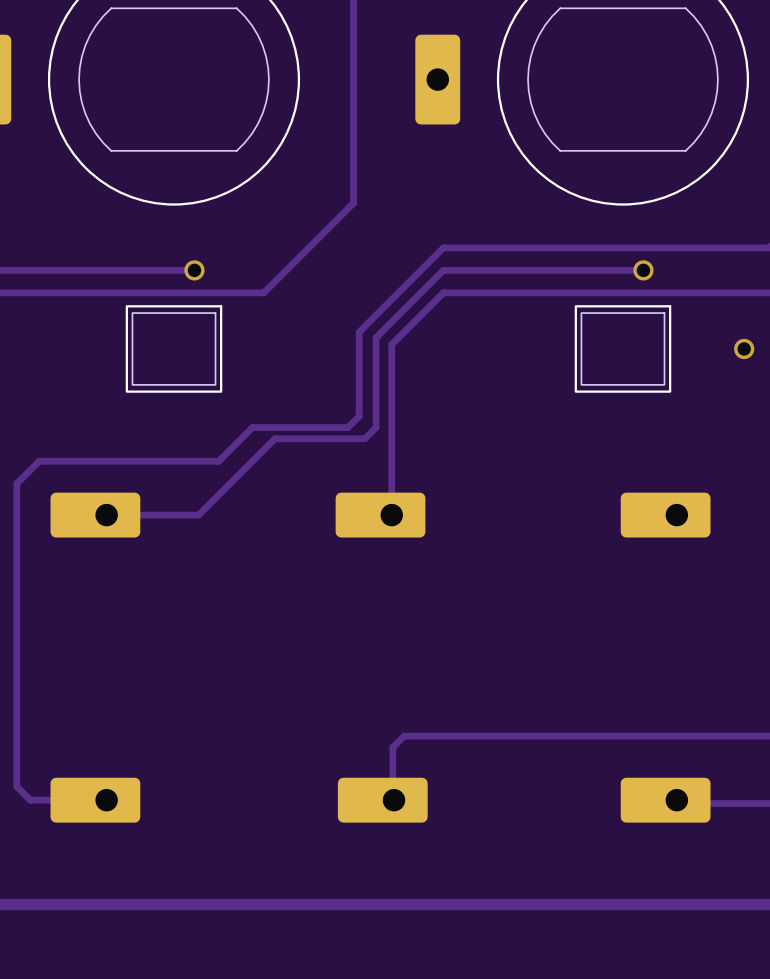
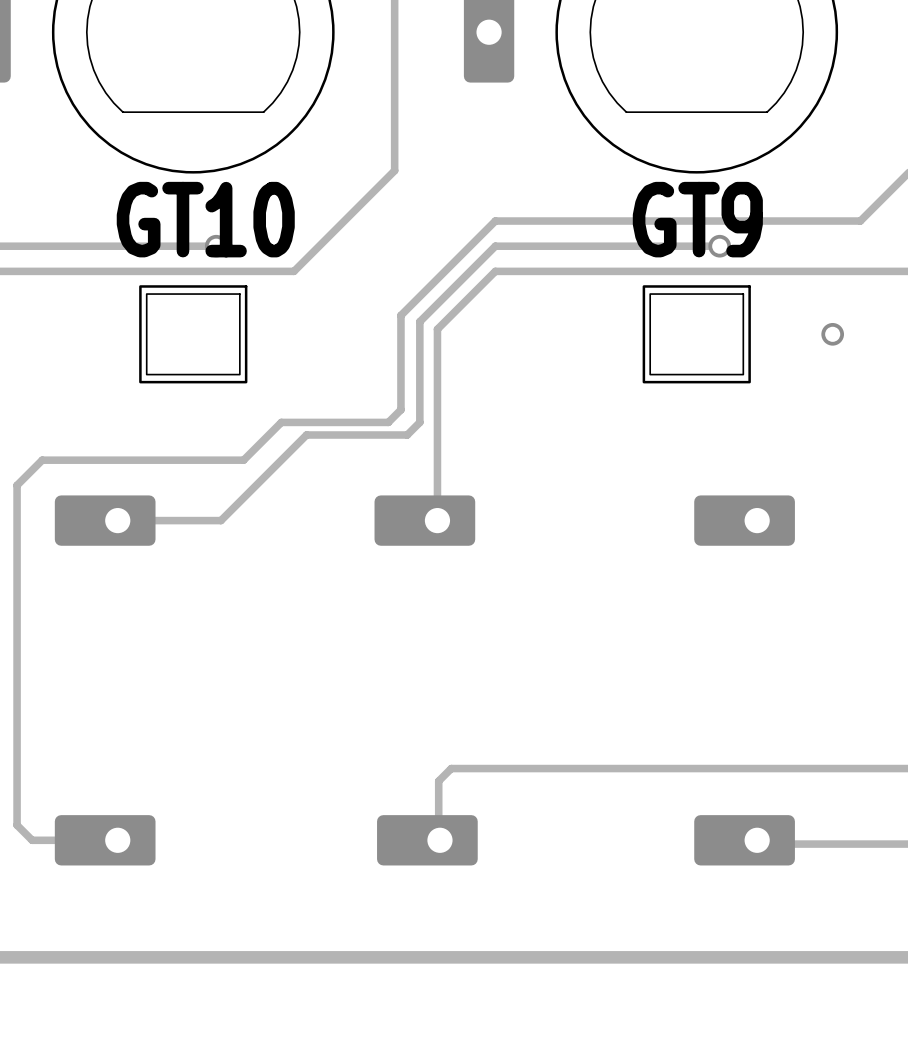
text: none -> GT10 (205, 219)
text: none -> GT9 (697, 219)

